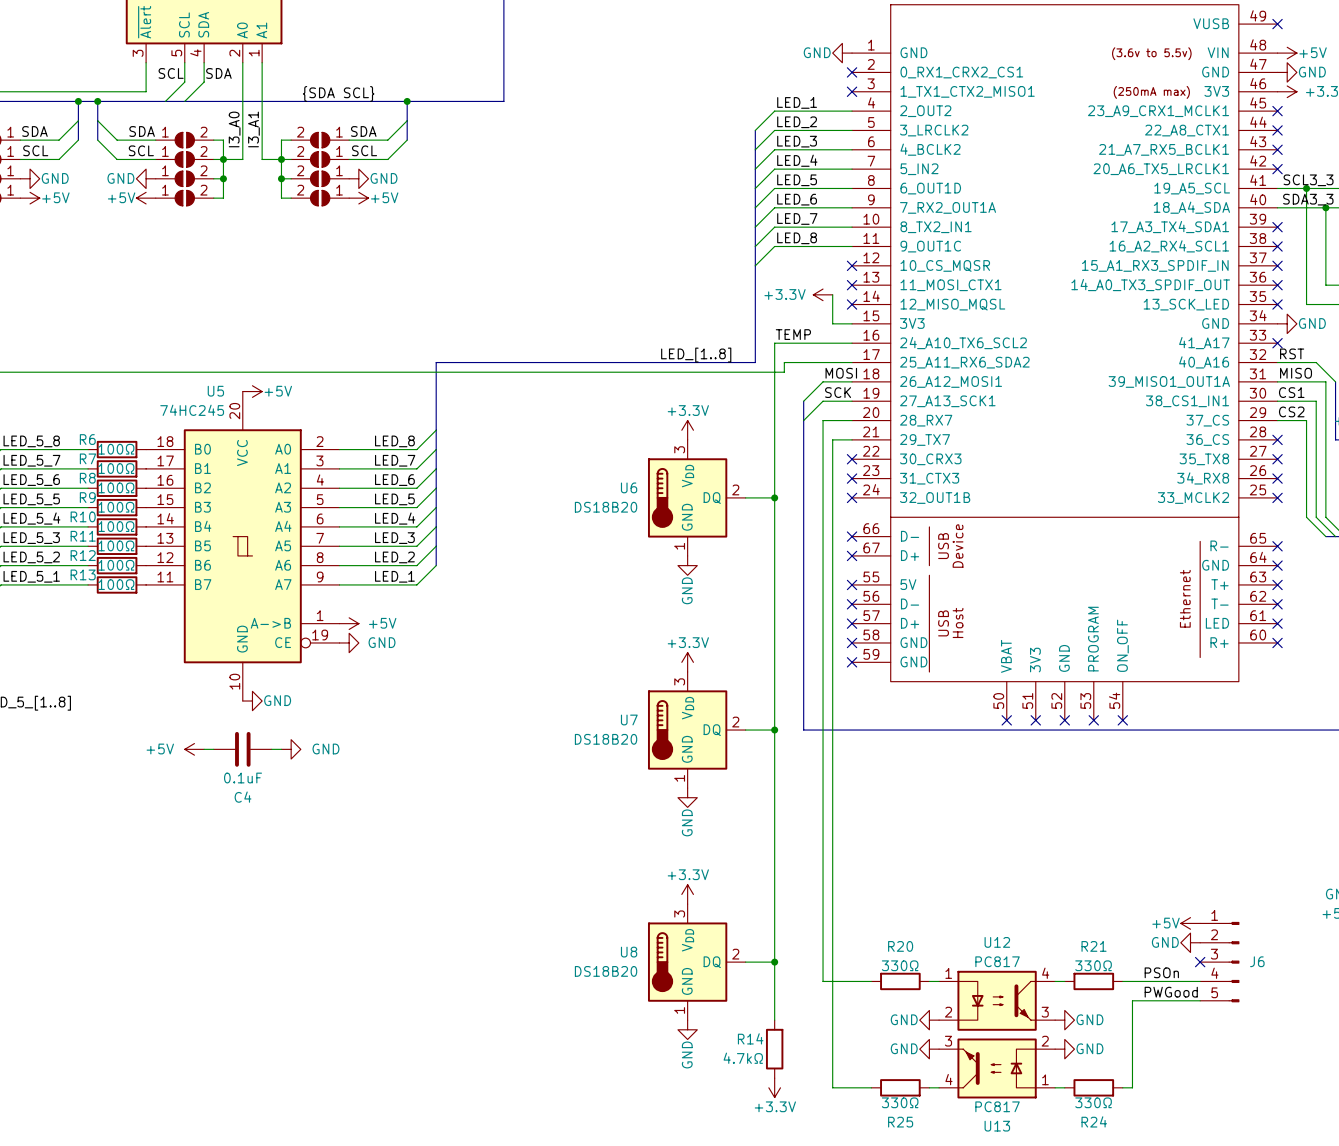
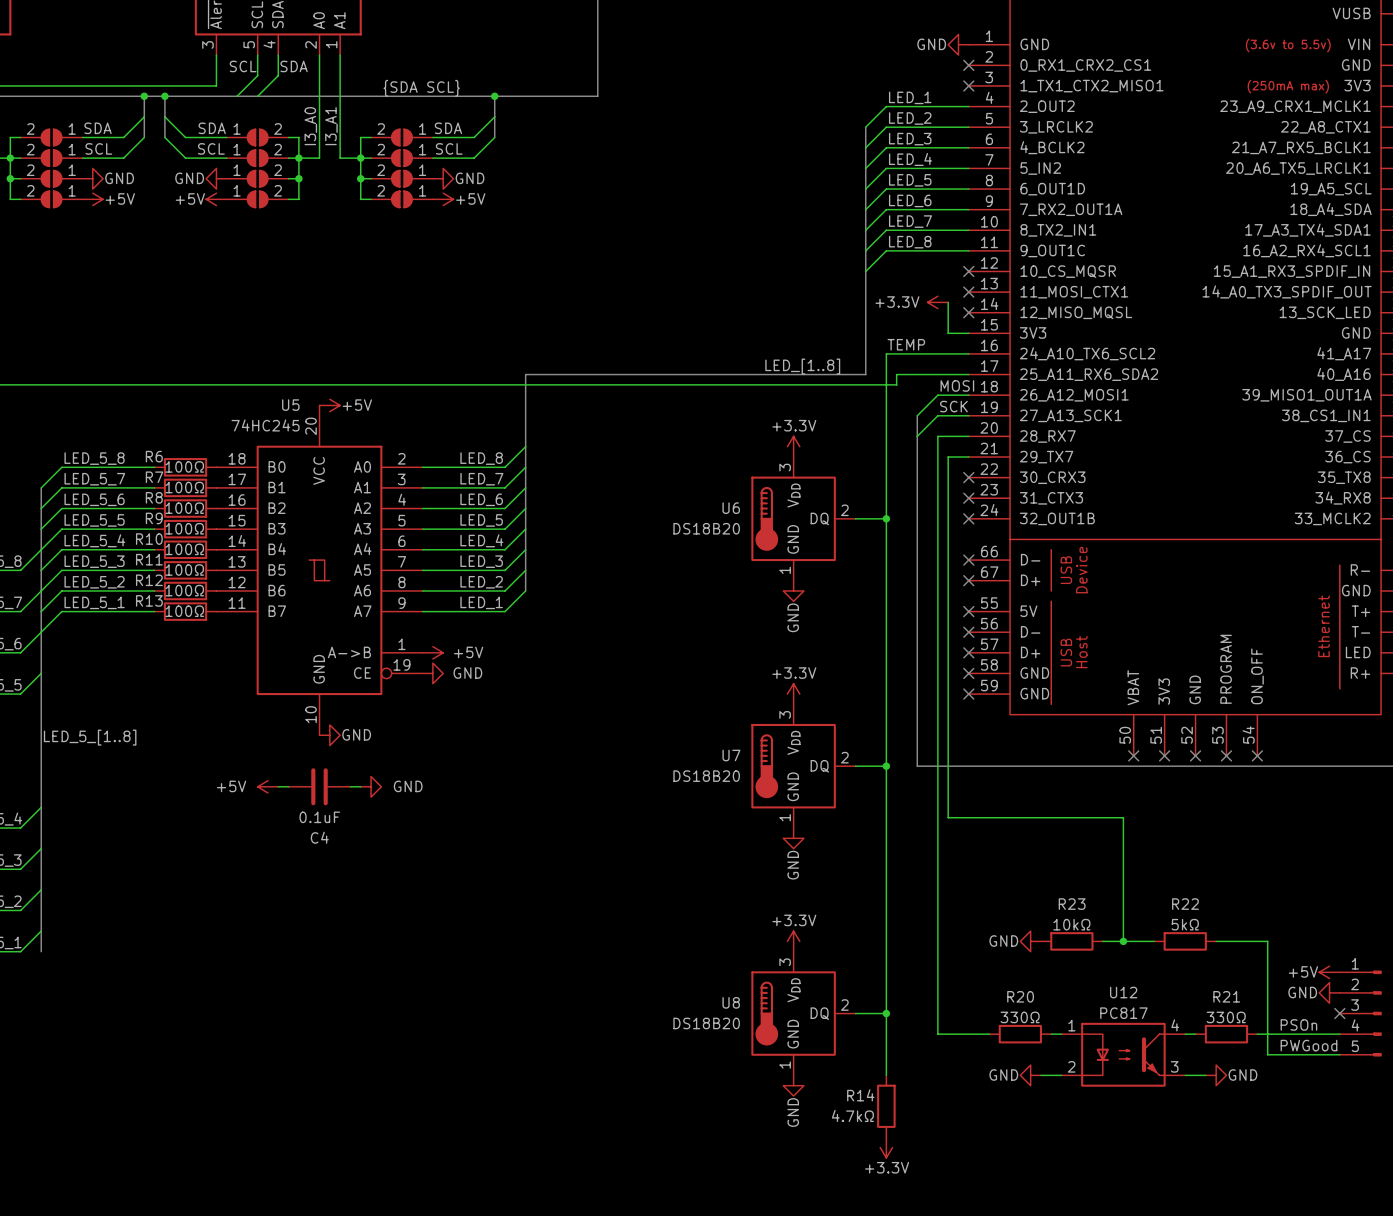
wire: (832, 778) (832, 1087) (871, 1087) -> (948, 817) (1123, 817) (1123, 941)
power symbol: none -> GND (1030, 941)
R23: none -> 10kΩ (1071, 941)
wire: none -> (1102, 941) (1154, 941)
junction: none -> (1123, 941)
R22: none -> 5kΩ (1185, 941)
wire: (1132, 1000) (1132, 1087) (1122, 1087) -> (1267, 1054) (1267, 941) (1216, 941)
power symbol: none -> GND (1030, 1075)
power symbol: GND (929, 1020) -> none
power symbol: GND (1064, 1020) -> none
power symbol: none -> GND (1216, 1075)
power symbol: GND (929, 1049) -> none
power symbol: GND (1064, 1049) -> none
U13: PC817 (997, 1068) -> none
R25: 330Ω (900, 1087) -> none
wire: (929, 1087) (939, 1087) -> none
wire: (1055, 1087) (1064, 1087) -> none
R24: 330Ω (1093, 1087) -> none

